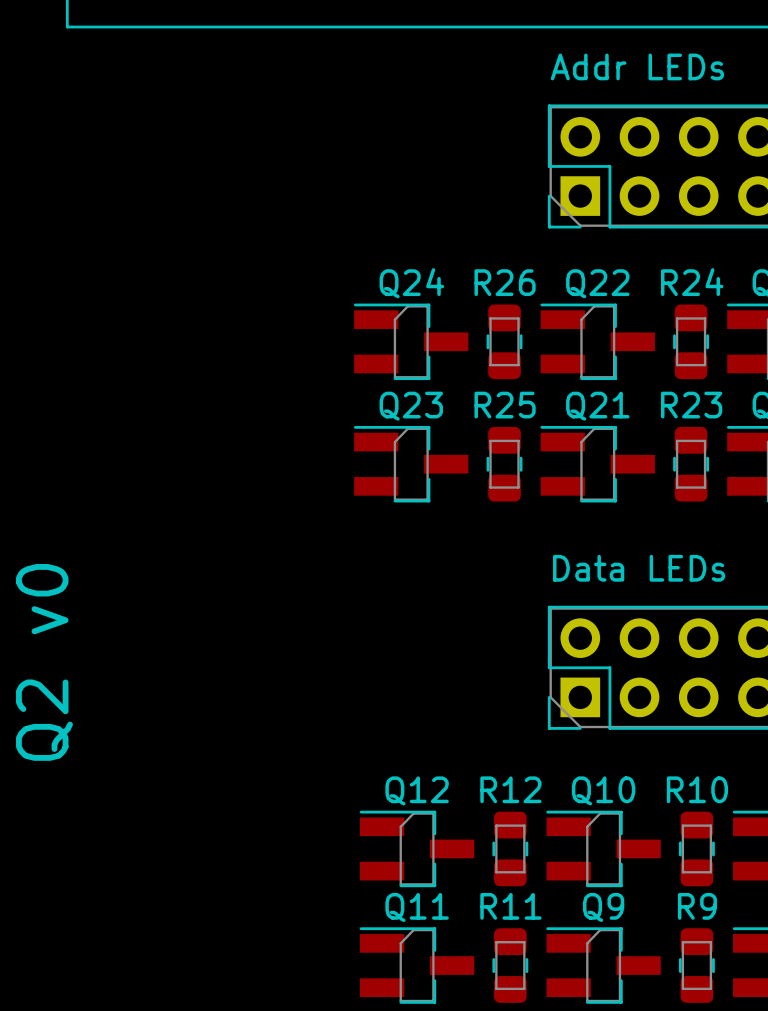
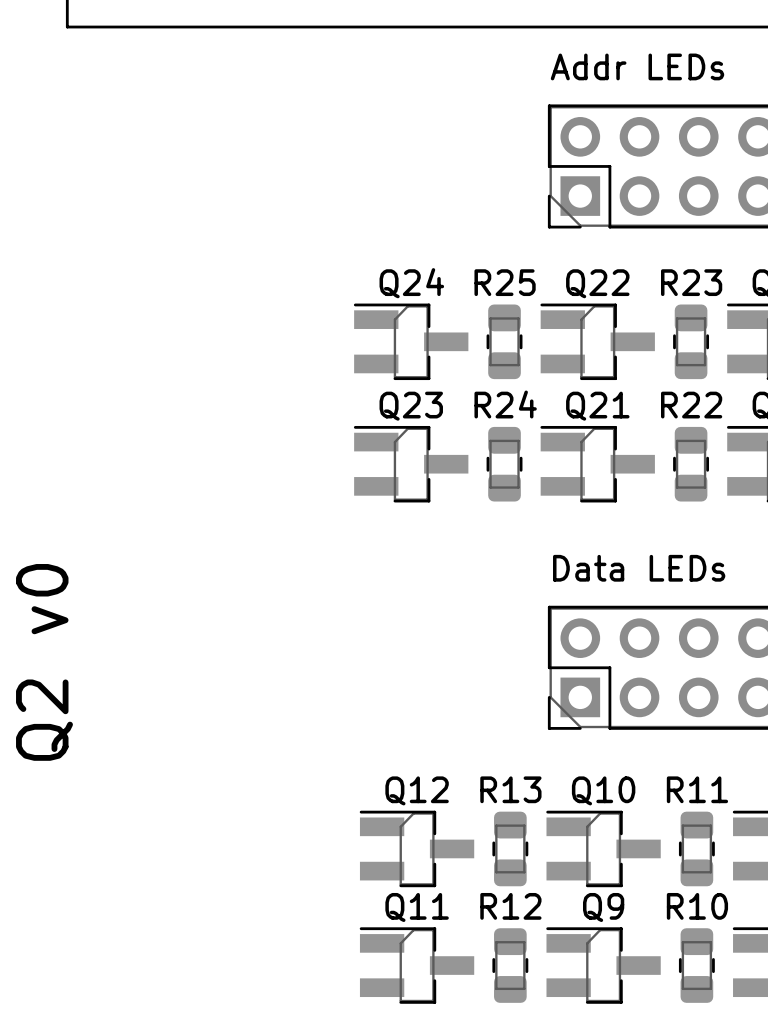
R26 name: R26 (505, 282) -> R25 (505, 282)
R24 name: R24 (692, 282) -> R23 (691, 282)
R25 name: R25 (505, 405) -> R24 (505, 404)
R23 name: R23 (691, 405) -> R22 (691, 405)
R12 name: R12 (510, 789) -> R13 (510, 789)
R10 name: R10 (697, 789) -> R11 (697, 789)
R11 name: R11 (510, 906) -> R12 (510, 906)
R9 name: R9 (697, 906) -> R10 (697, 906)

